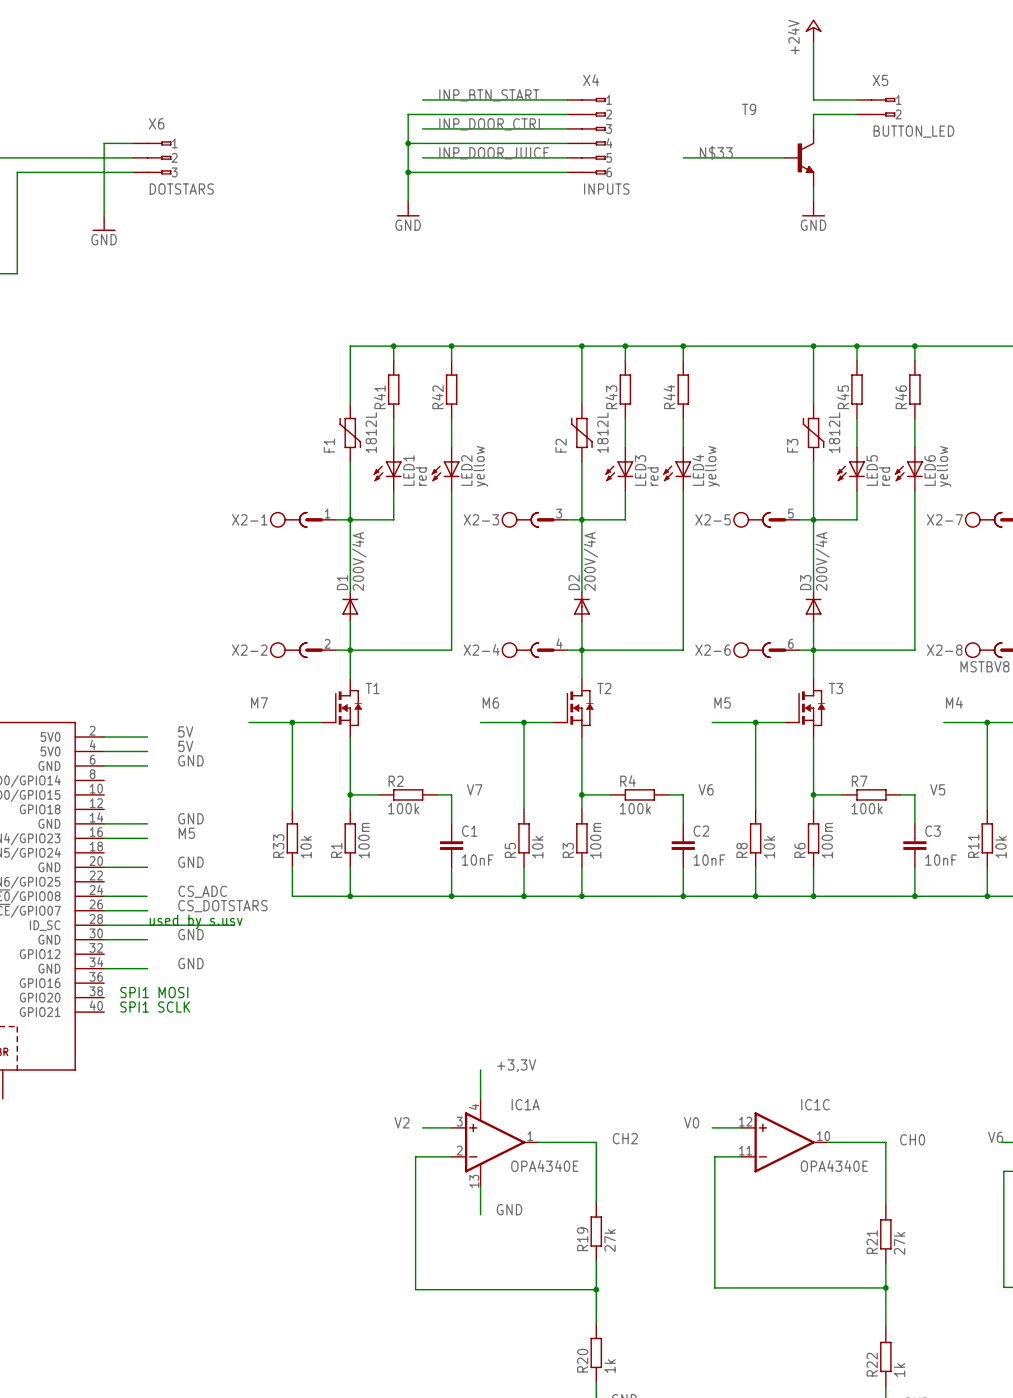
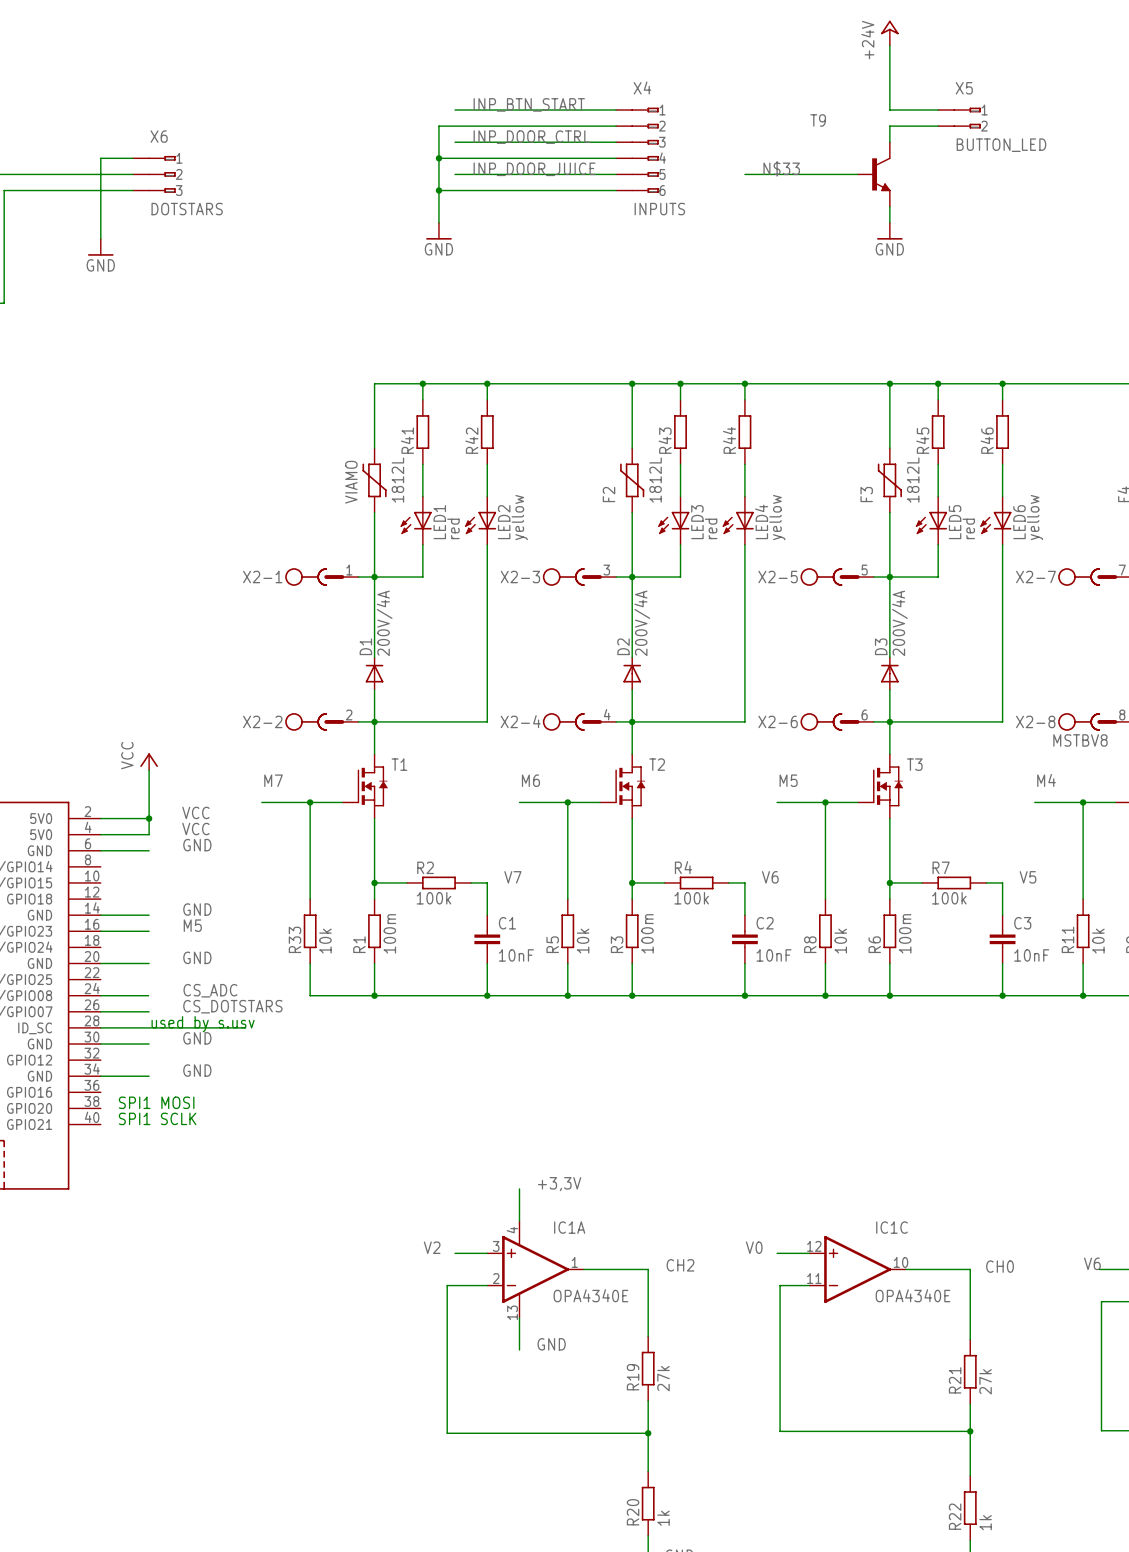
F1 name: F1 (329, 445) -> VIAMO (351, 482)
power symbol: none -> VCC (149, 761)
wire: none -> (149, 770) (149, 834)
label: 5V (185, 731) -> VCC (195, 812)
junction: none -> (149, 818)
label: 5V (185, 746) -> VCC (195, 829)

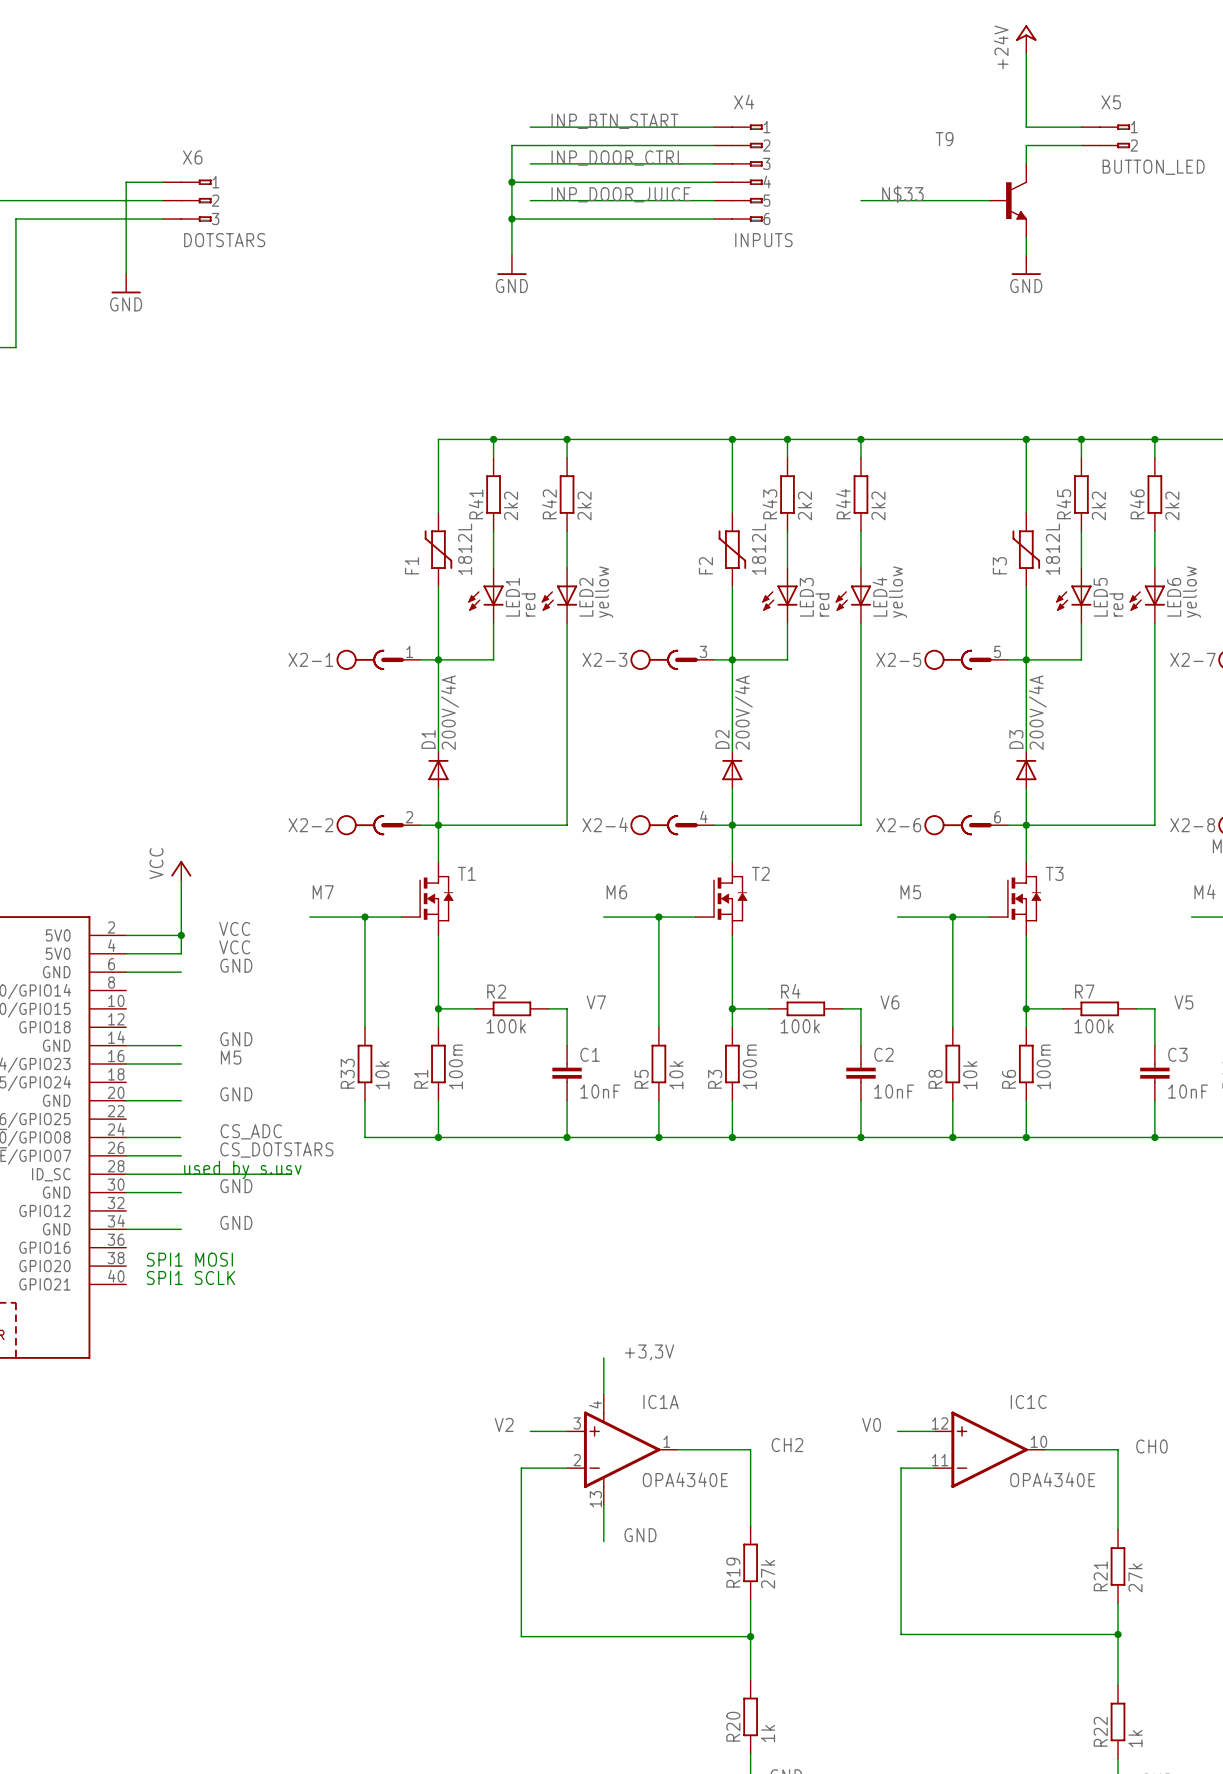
R41 value: none -> 2k2 (511, 505)
R42 value: none -> 2k2 (584, 505)
R43 value: none -> 2k2 (804, 505)
R44 value: none -> 2k2 (878, 505)
R45 value: none -> 2k2 (1098, 505)
R46 value: none -> 2k2 (1172, 505)
VIAMO name: VIAMO (351, 482) -> F1 (412, 565)

